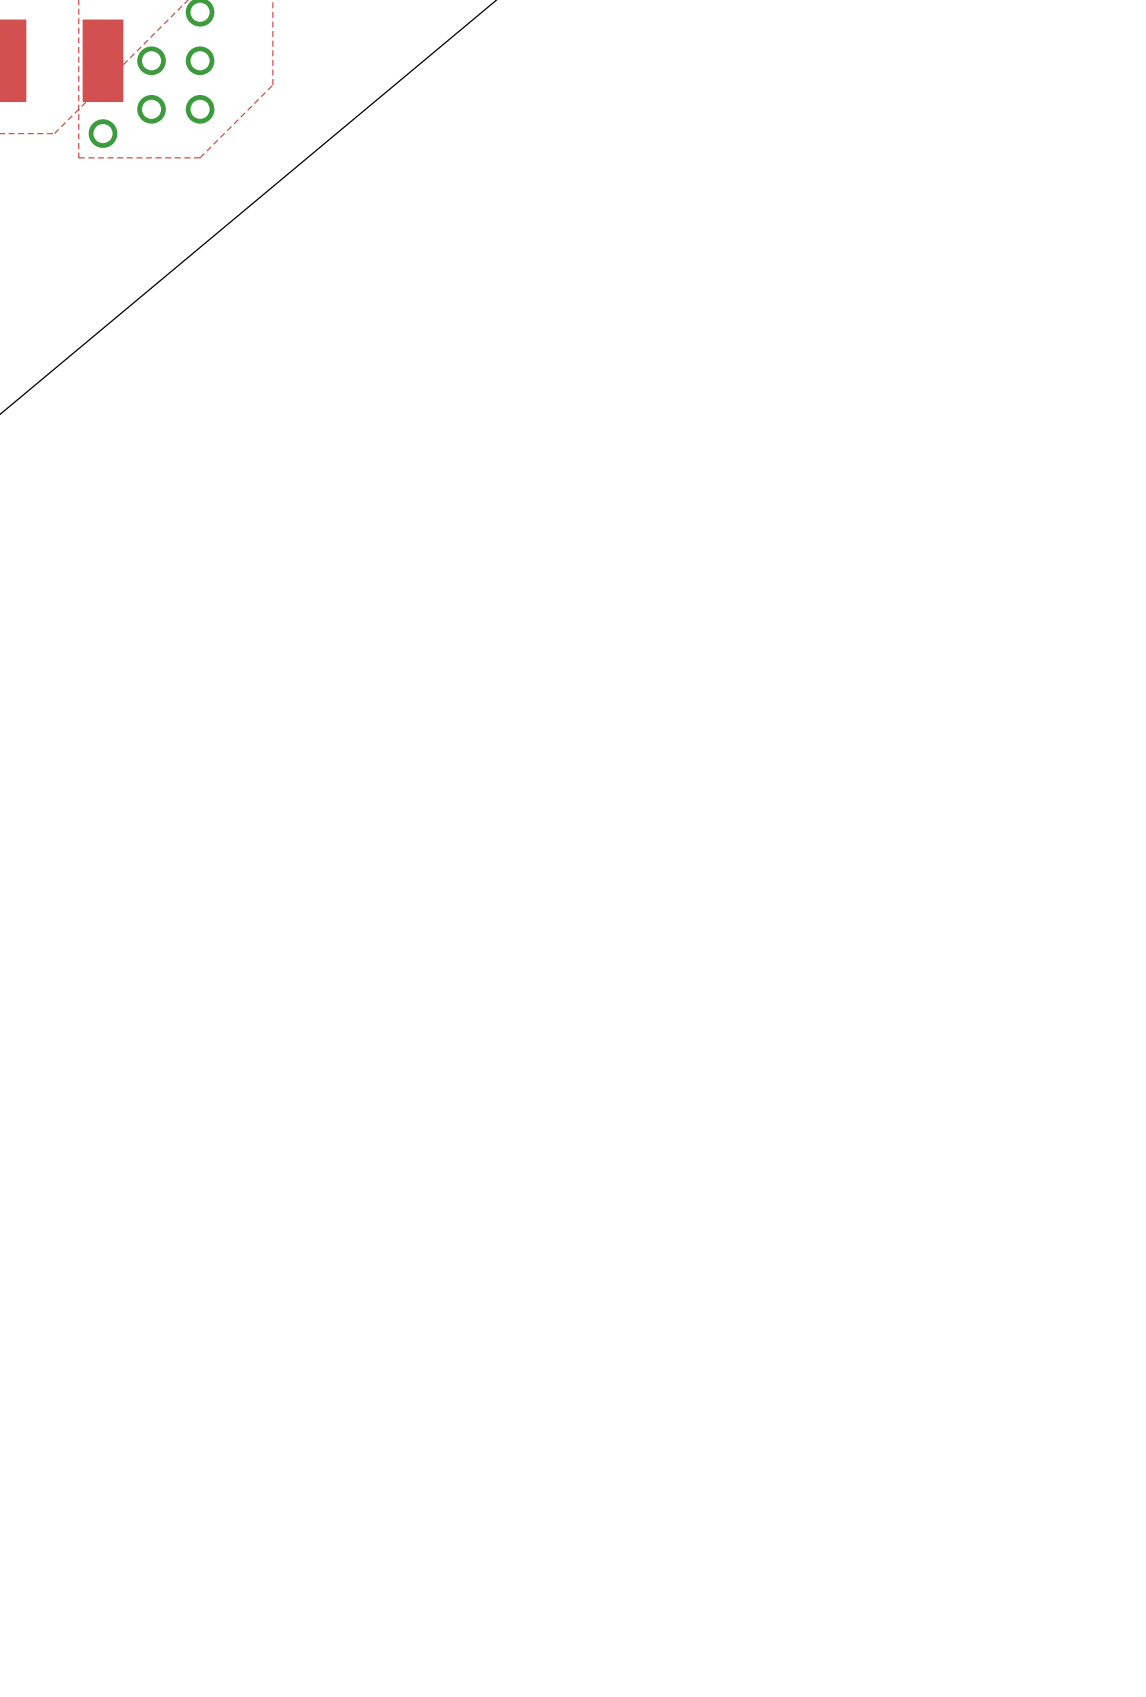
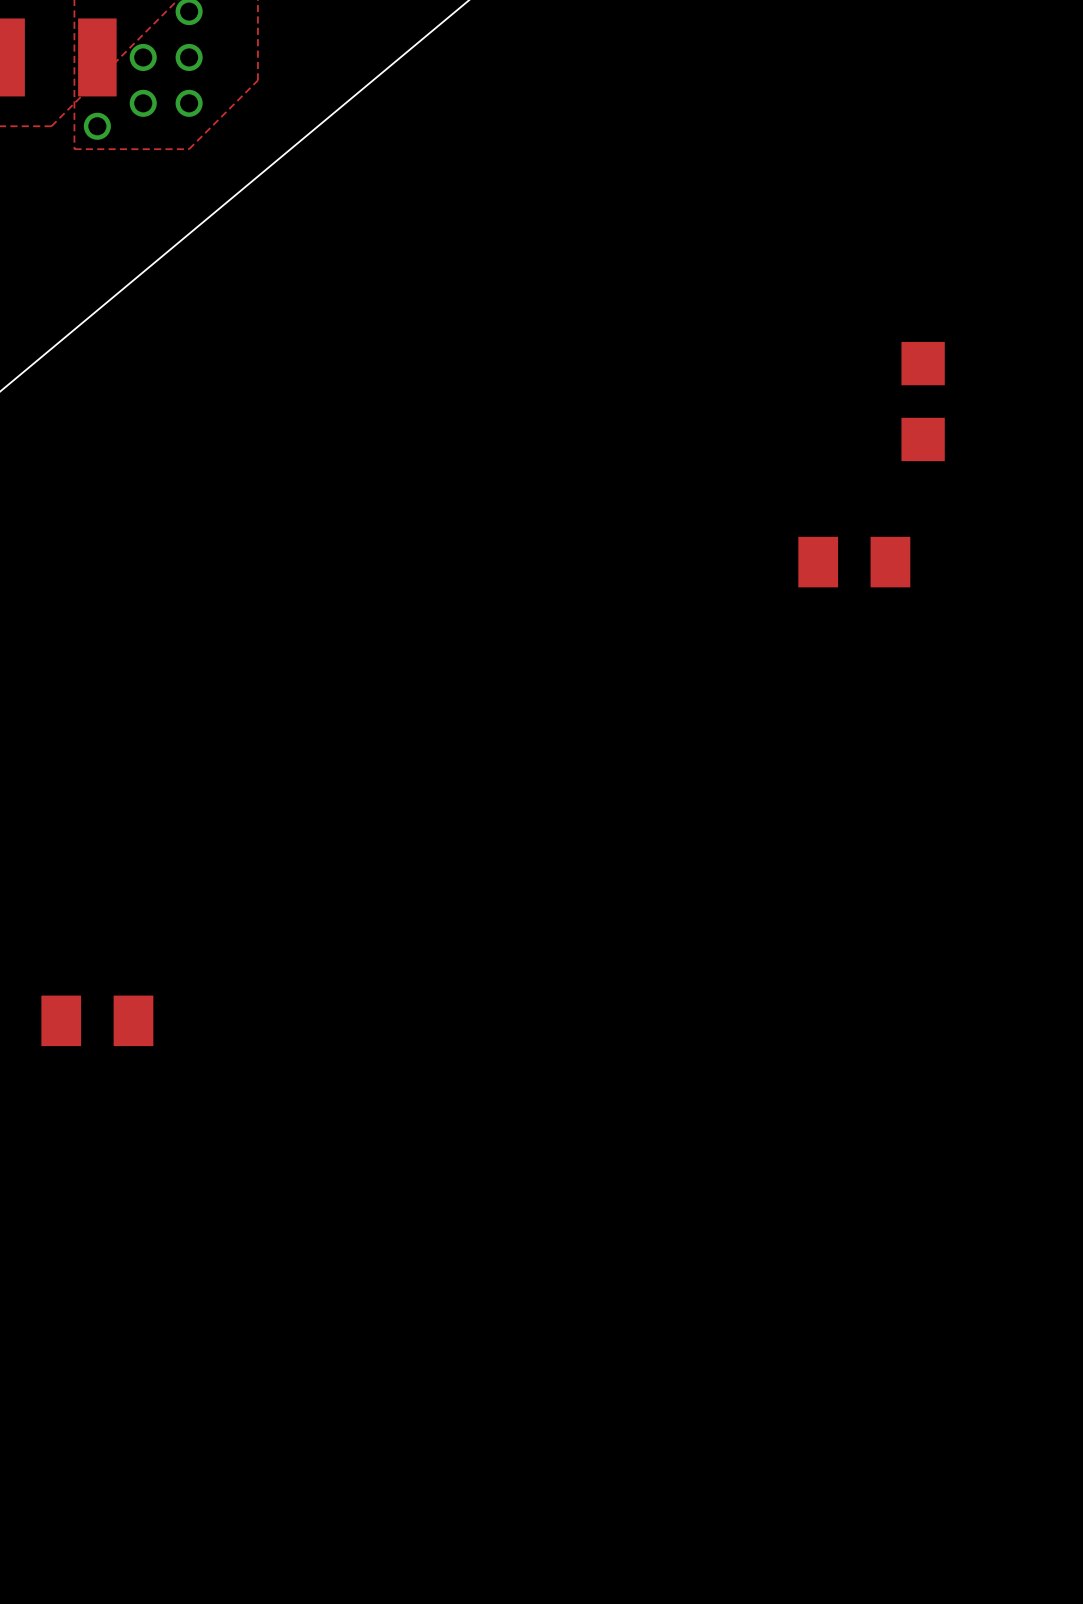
part: none -> (923, 401)
part: none -> (854, 562)
part: none -> (97, 1020)

